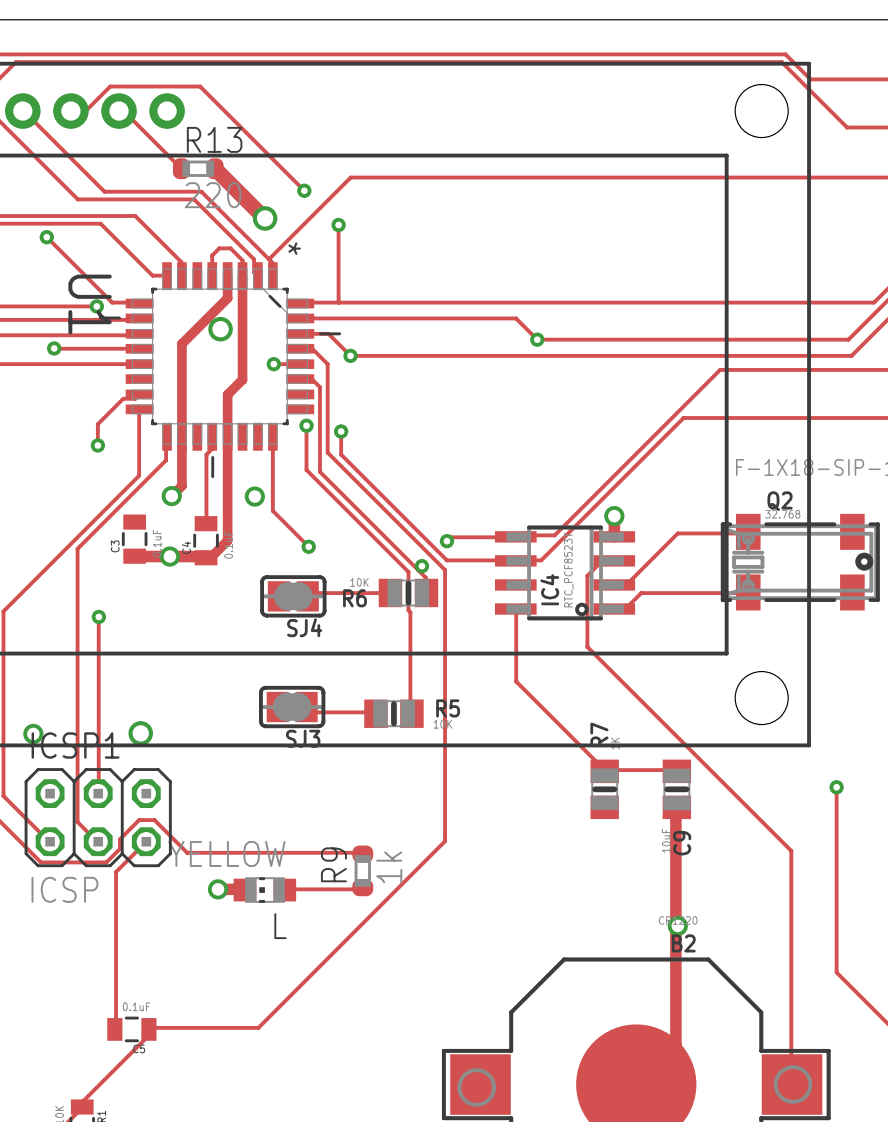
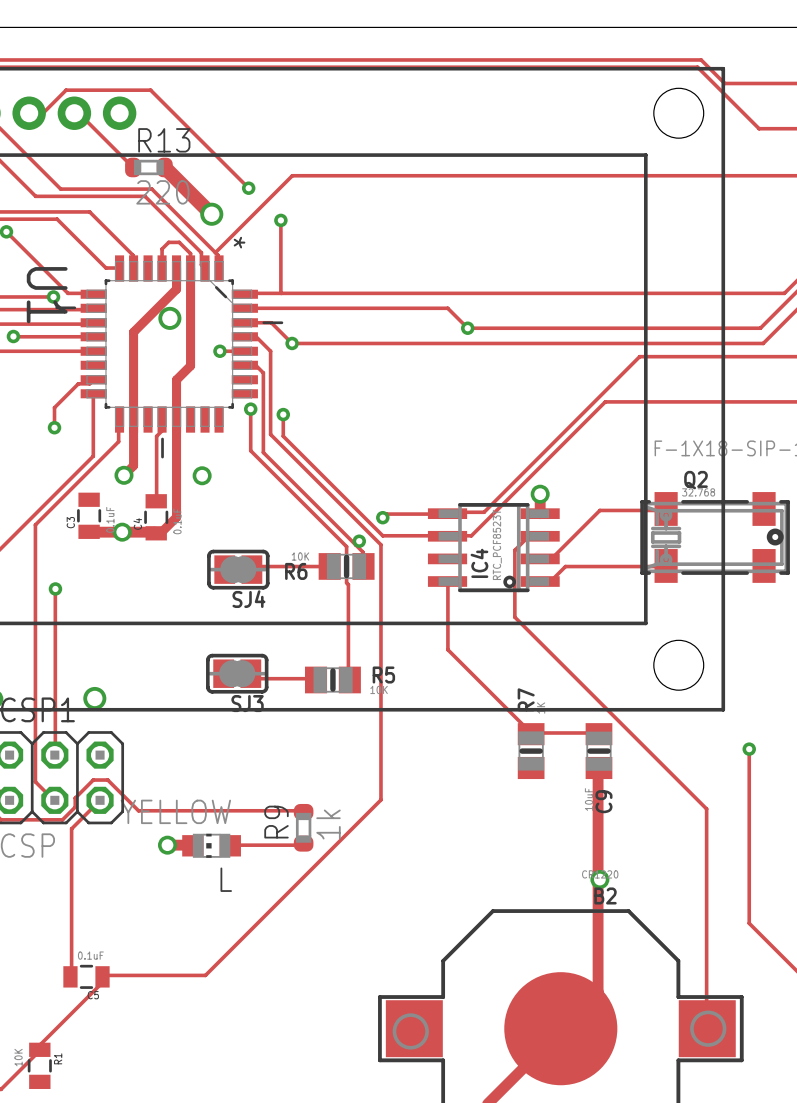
track: (272, 436) (272, 510) (308, 546) -> none
via: (308, 546) -> none

